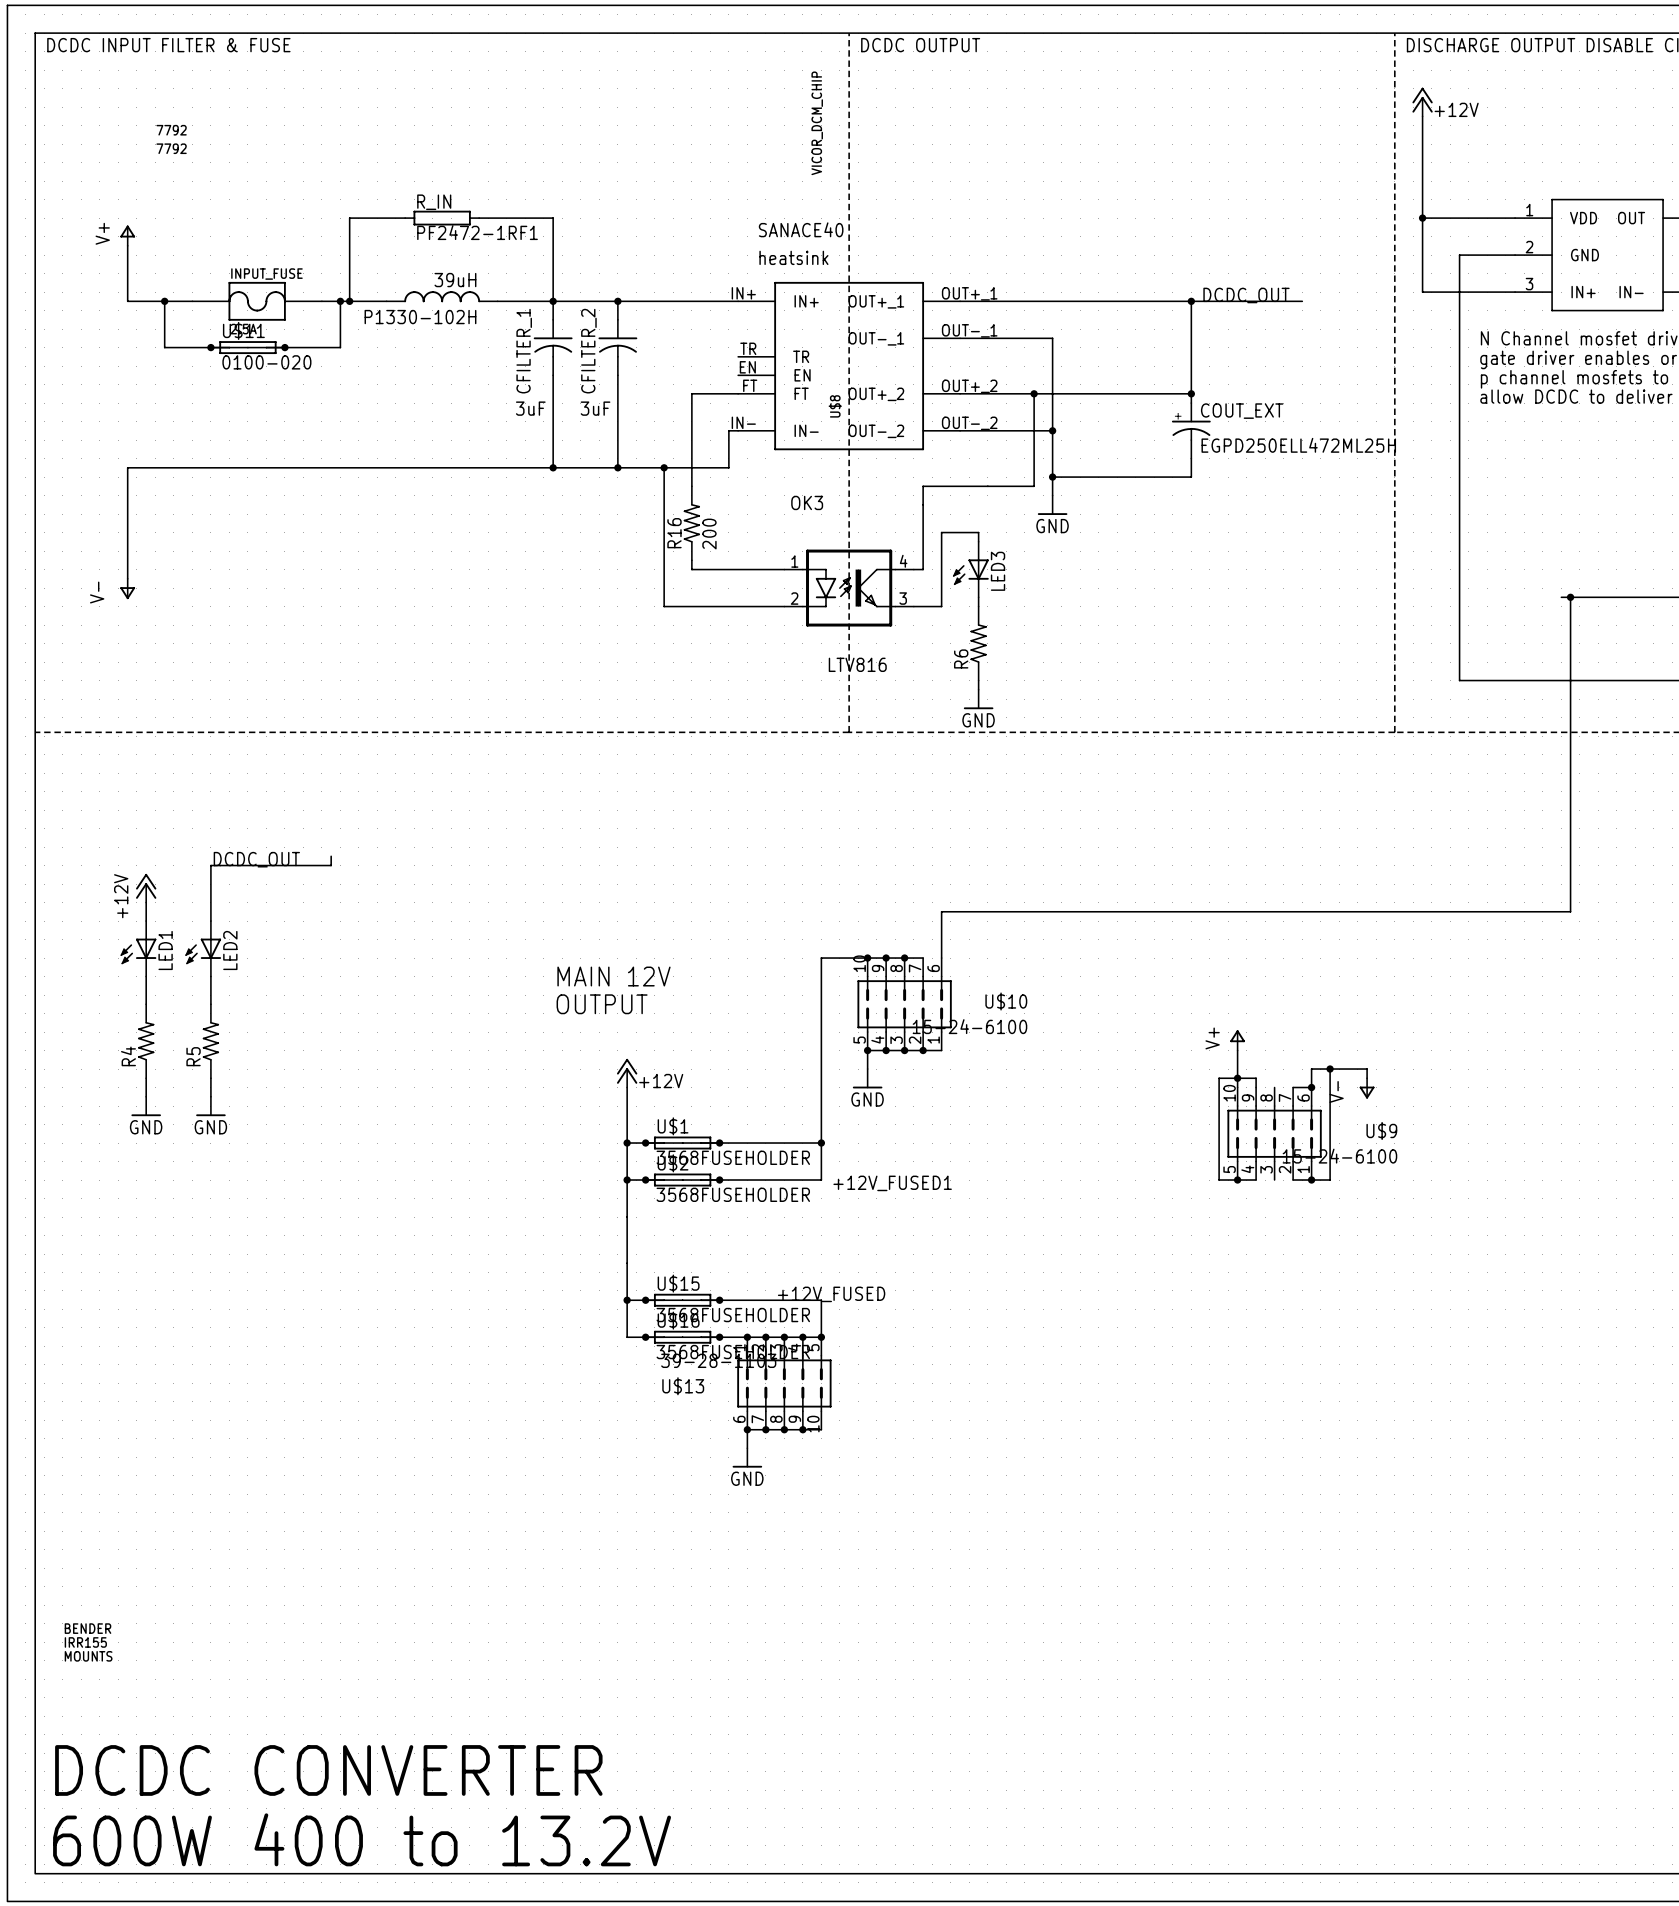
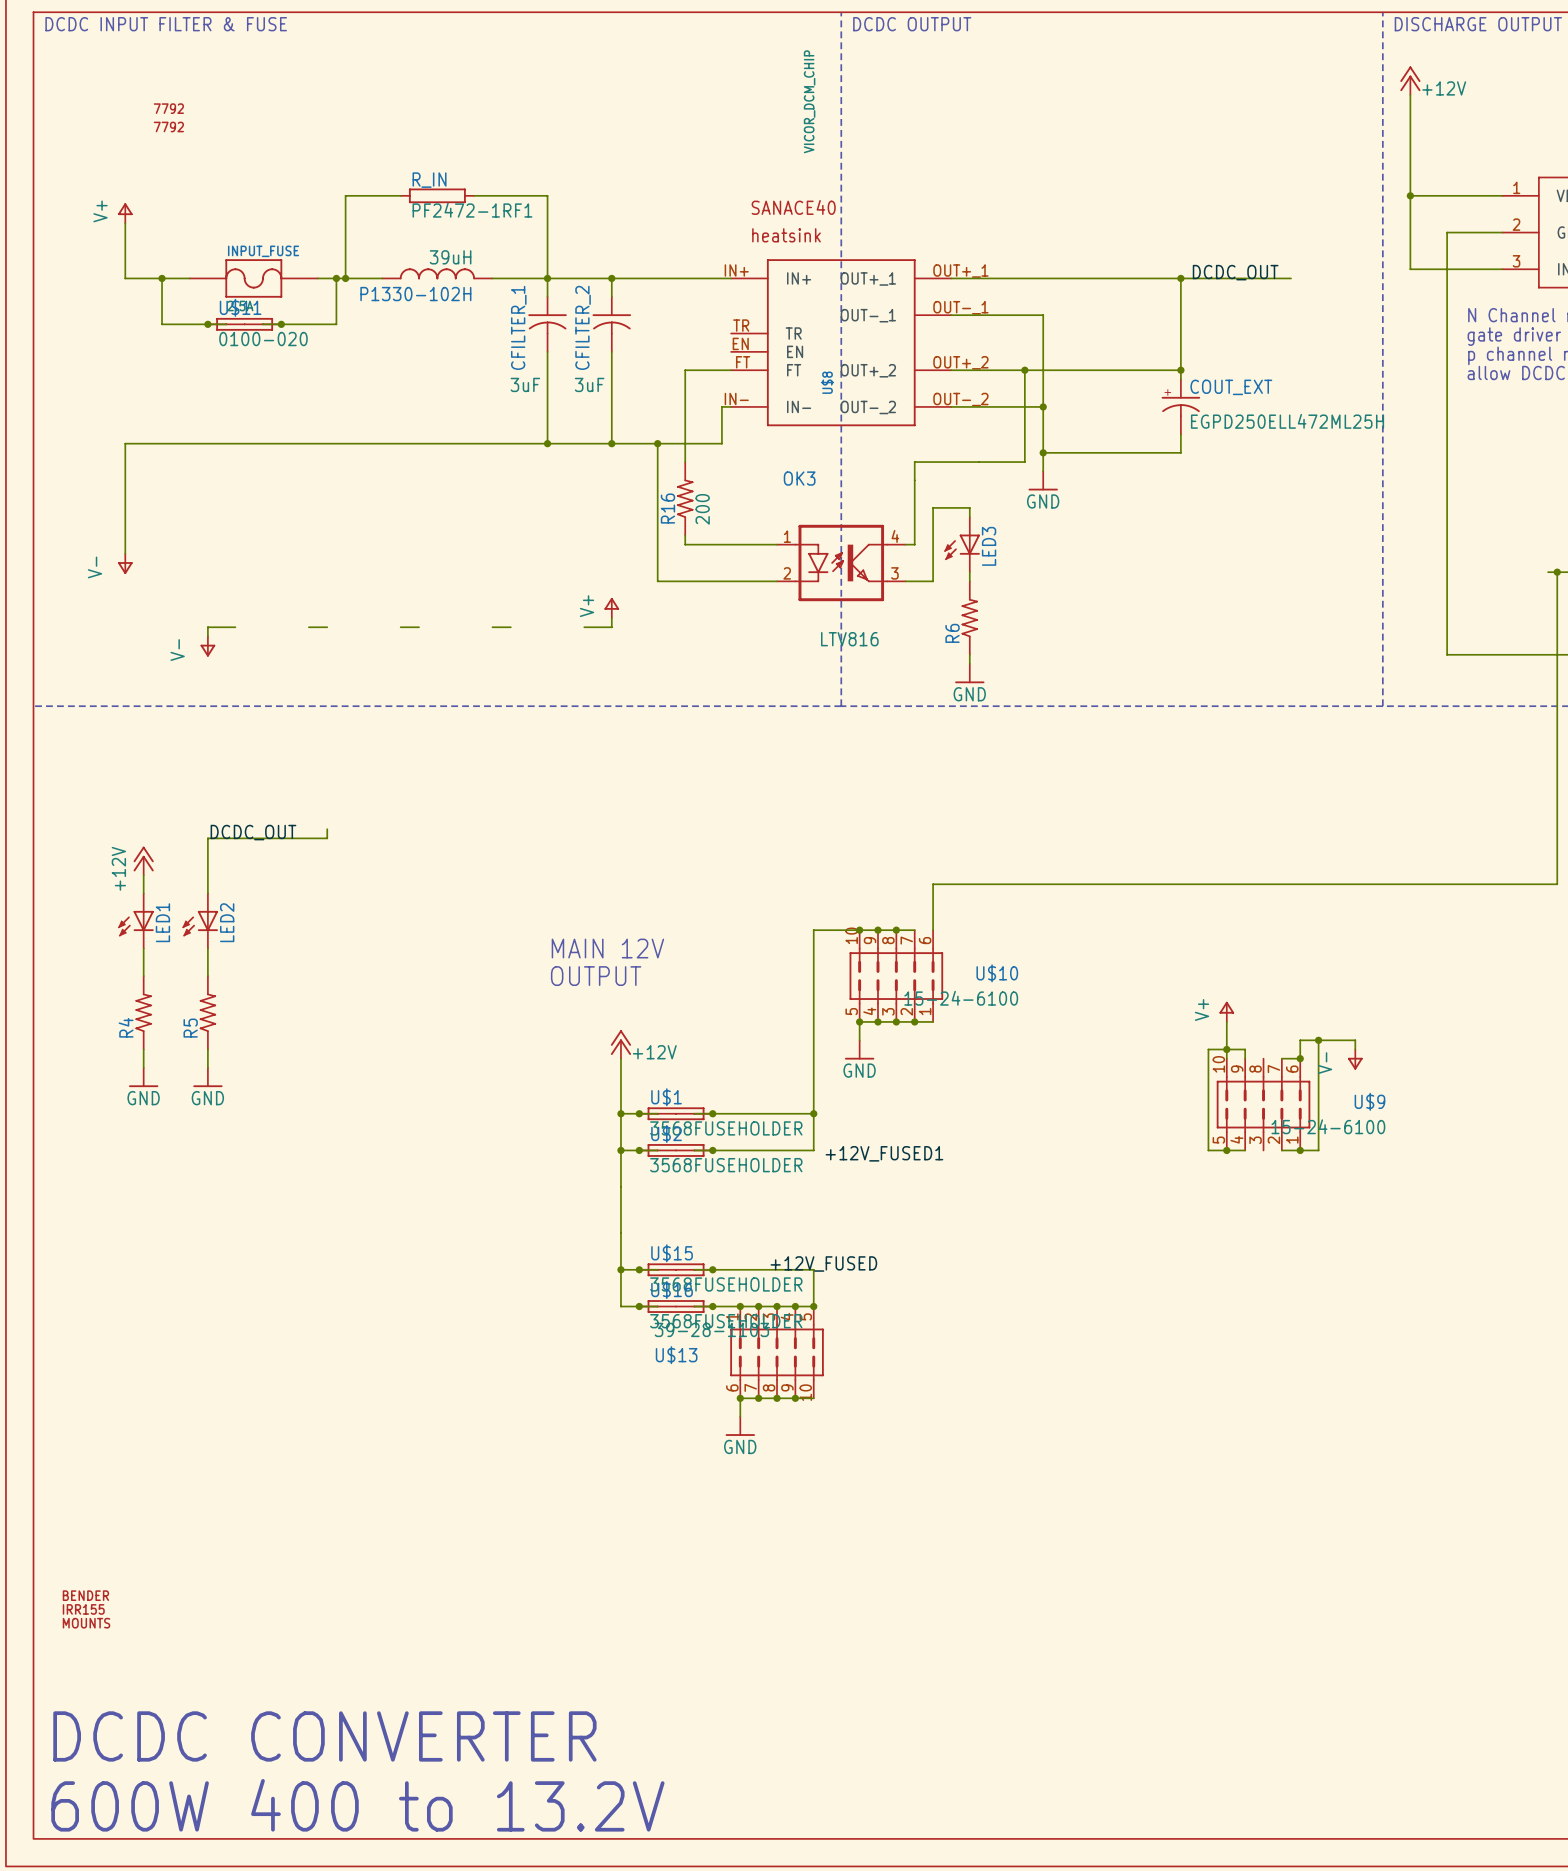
power symbol: none -> V+ (611, 607)
wire: none -> (611, 618) (611, 627) (584, 627)
wire: none -> (235, 627) (207, 627) (207, 636)
wire: none -> (308, 627) (327, 627)
wire: none -> (400, 627) (419, 627)
wire: none -> (492, 627) (510, 627)
power symbol: none -> V- (207, 646)

